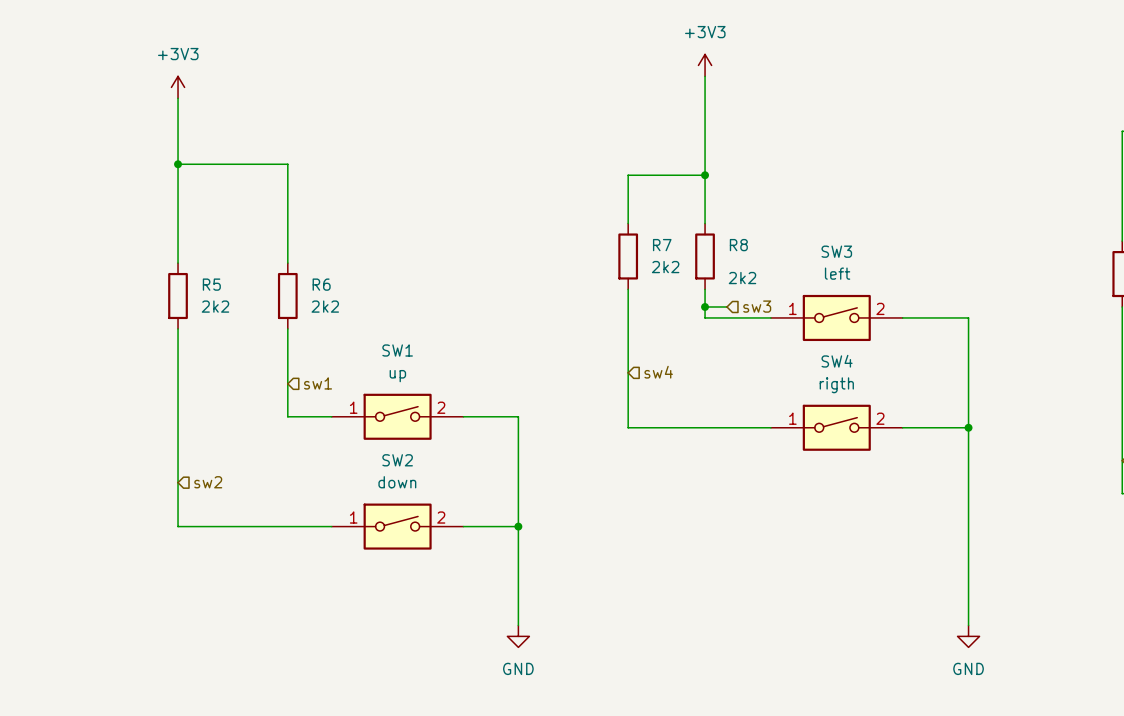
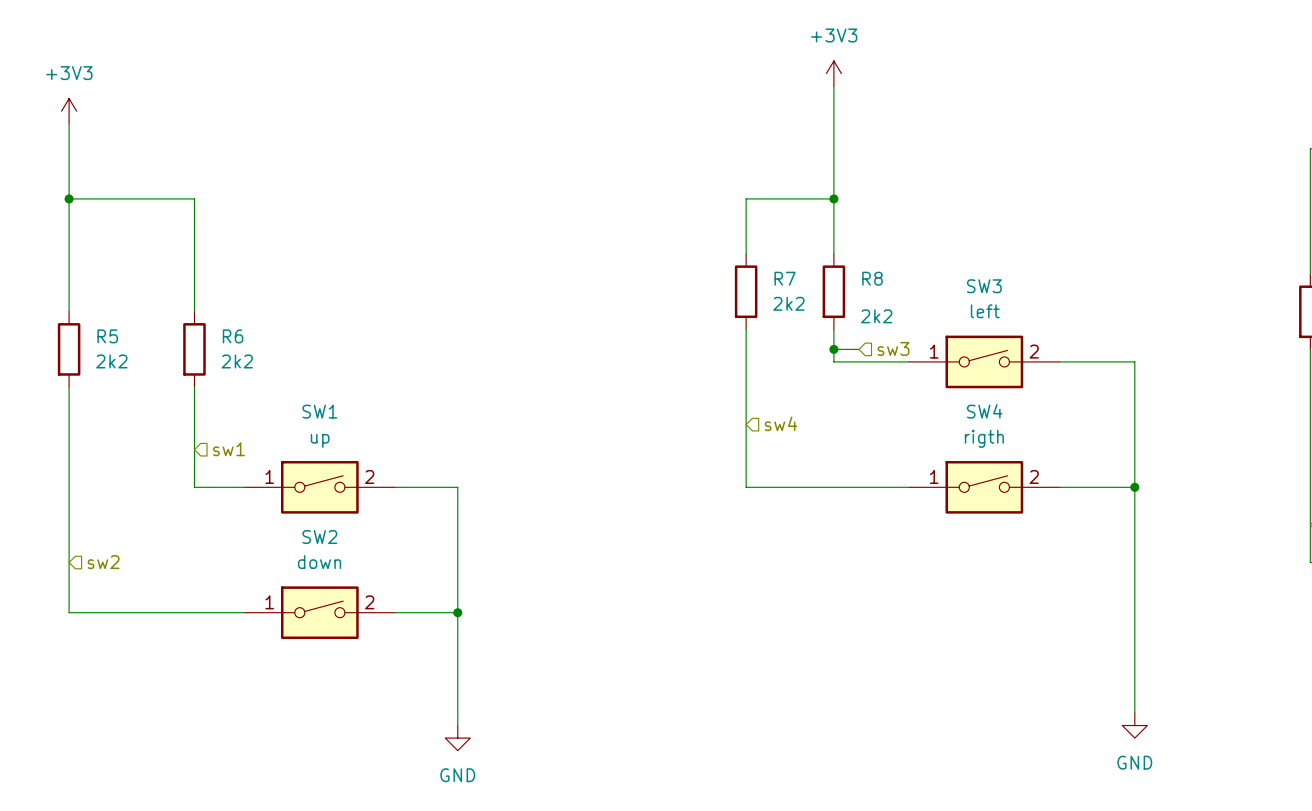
power symbol position: +3V3 (178, 87) -> +3V3 (69, 111)
wire: (178, 98) (178, 263) -> (69, 123) (69, 311)
wire: (178, 164) (287, 164) (287, 263) -> (69, 198) (194, 198) (194, 311)
junction: (178, 164) -> none
junction: none -> (69, 198)
R5 position: (178, 296) -> (69, 349)
R6 position: (287, 296) -> (194, 349)
wire: (178, 328) (178, 526) (331, 526) -> (69, 387) (69, 612) (244, 612)
wire: (287, 328) (287, 416) (331, 416) -> (194, 387) (194, 487) (244, 487)
hierarchical label position: sw1 (318, 383) -> sw1 (228, 449)
SW1 position: (397, 416) -> (319, 487)
wire: (463, 416) (518, 416) (518, 625) -> (395, 487) (457, 487) (457, 725)
hierarchical label position: sw2 (208, 482) -> sw2 (103, 562)
SW2 position: (397, 526) -> (319, 612)
wire: (463, 526) (518, 526) -> (395, 612) (457, 612)
junction: (518, 526) -> none
junction: none -> (457, 612)
power symbol position: GND (518, 636) -> GND (457, 738)

